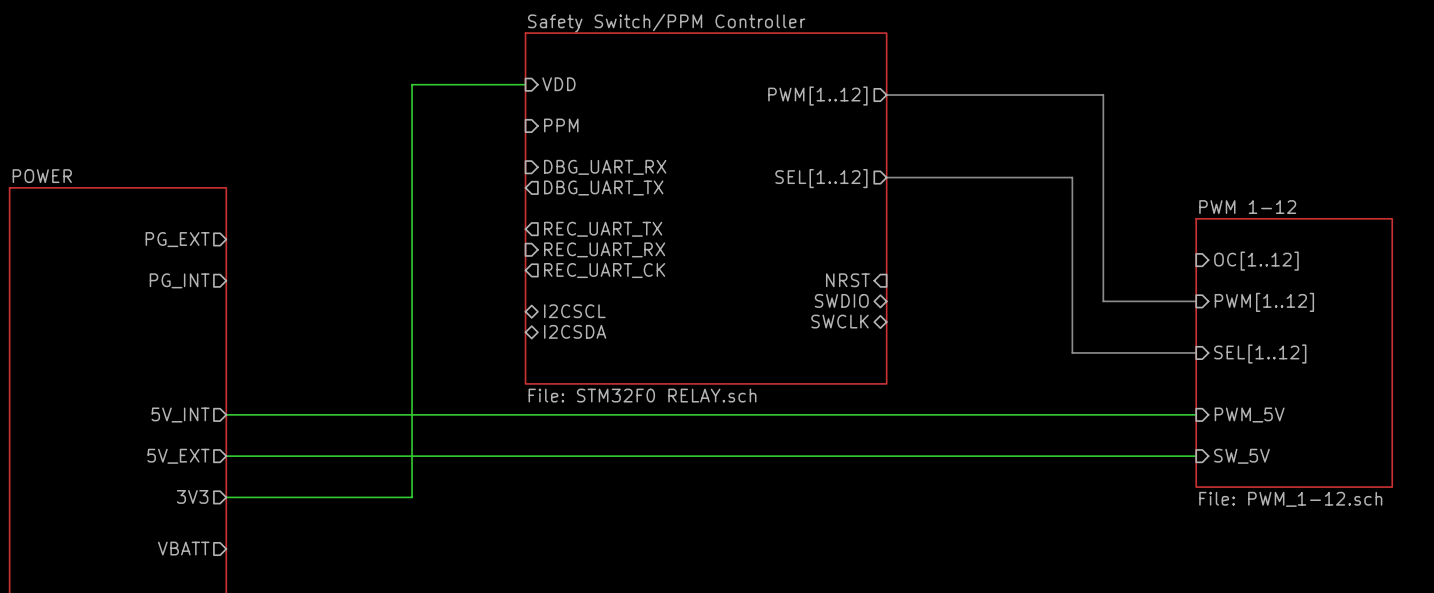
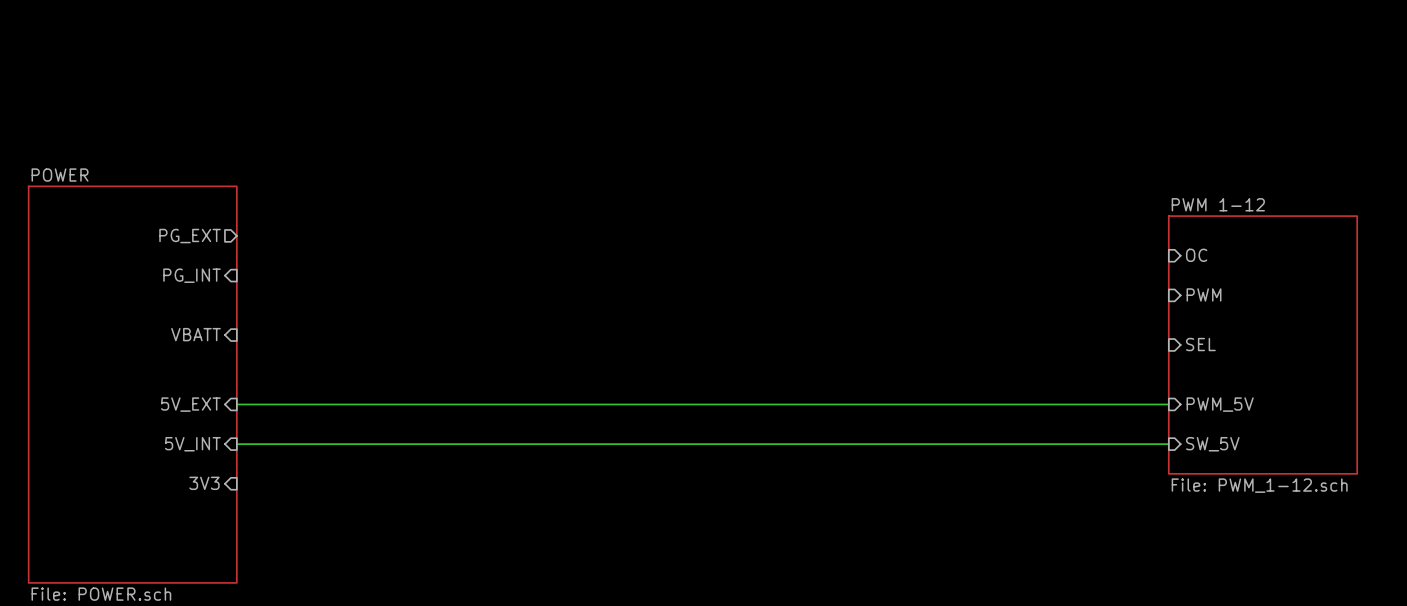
wire: (525, 84) (412, 84) (412, 497) (226, 497) -> none
sheet pin: VDD (558, 84) -> none
bus: (886, 95) (1103, 95) (1103, 301) (1196, 301) -> none
sheet pin: PWM[1..12] (817, 96) -> none
sheet pin: PPM (561, 125) -> none
sheet pin: DBG_UART_RX (605, 167) -> none
bus: (886, 177) (1072, 177) (1072, 352) (1196, 352) -> none
sheet pin: SEL[1..12] (821, 178) -> none
sheet pin: DBG_UART_TX (603, 188) -> none
sheet Safety Switch/PPM Controller: File: STM32F0 RELAY.sch (706, 208) -> none
sheet pin: REC_UART_TX (603, 229) -> none
sheet pin: REC_UART_RX (604, 249) -> none
sheet pin: OC[1..12] (1256, 261) -> OC (1196, 255)
sheet pin: REC_UART_CK (604, 270) -> none
sheet pin shape: output (179, 280) -> input (192, 275)
sheet pin: NRST (847, 280) -> none
sheet pin: SWDIO (841, 300) -> none
sheet pin: PWM[1..12] (1264, 302) -> PWM (1204, 294)
sheet pin: I2CSCL (574, 311) -> none
sheet pin: SWCLK (840, 321) -> none
sheet pin: I2CSDA (575, 331) -> none
sheet pin: none -> VBATT (195, 334)
sheet pin: SEL[1..12] (1260, 353) -> SEL (1200, 344)
sheet pin shape: output (180, 415) -> input (190, 404)
sheet pin: 5V_INT (180, 415) -> 5V_EXT (190, 404)
sheet pin shape: output (178, 456) -> input (192, 444)
sheet pin: 5V_EXT (178, 456) -> 5V_INT (192, 444)
sheet pin shape: output (192, 496) -> input (204, 483)
sheet pin: VBATT (183, 548) -> none

